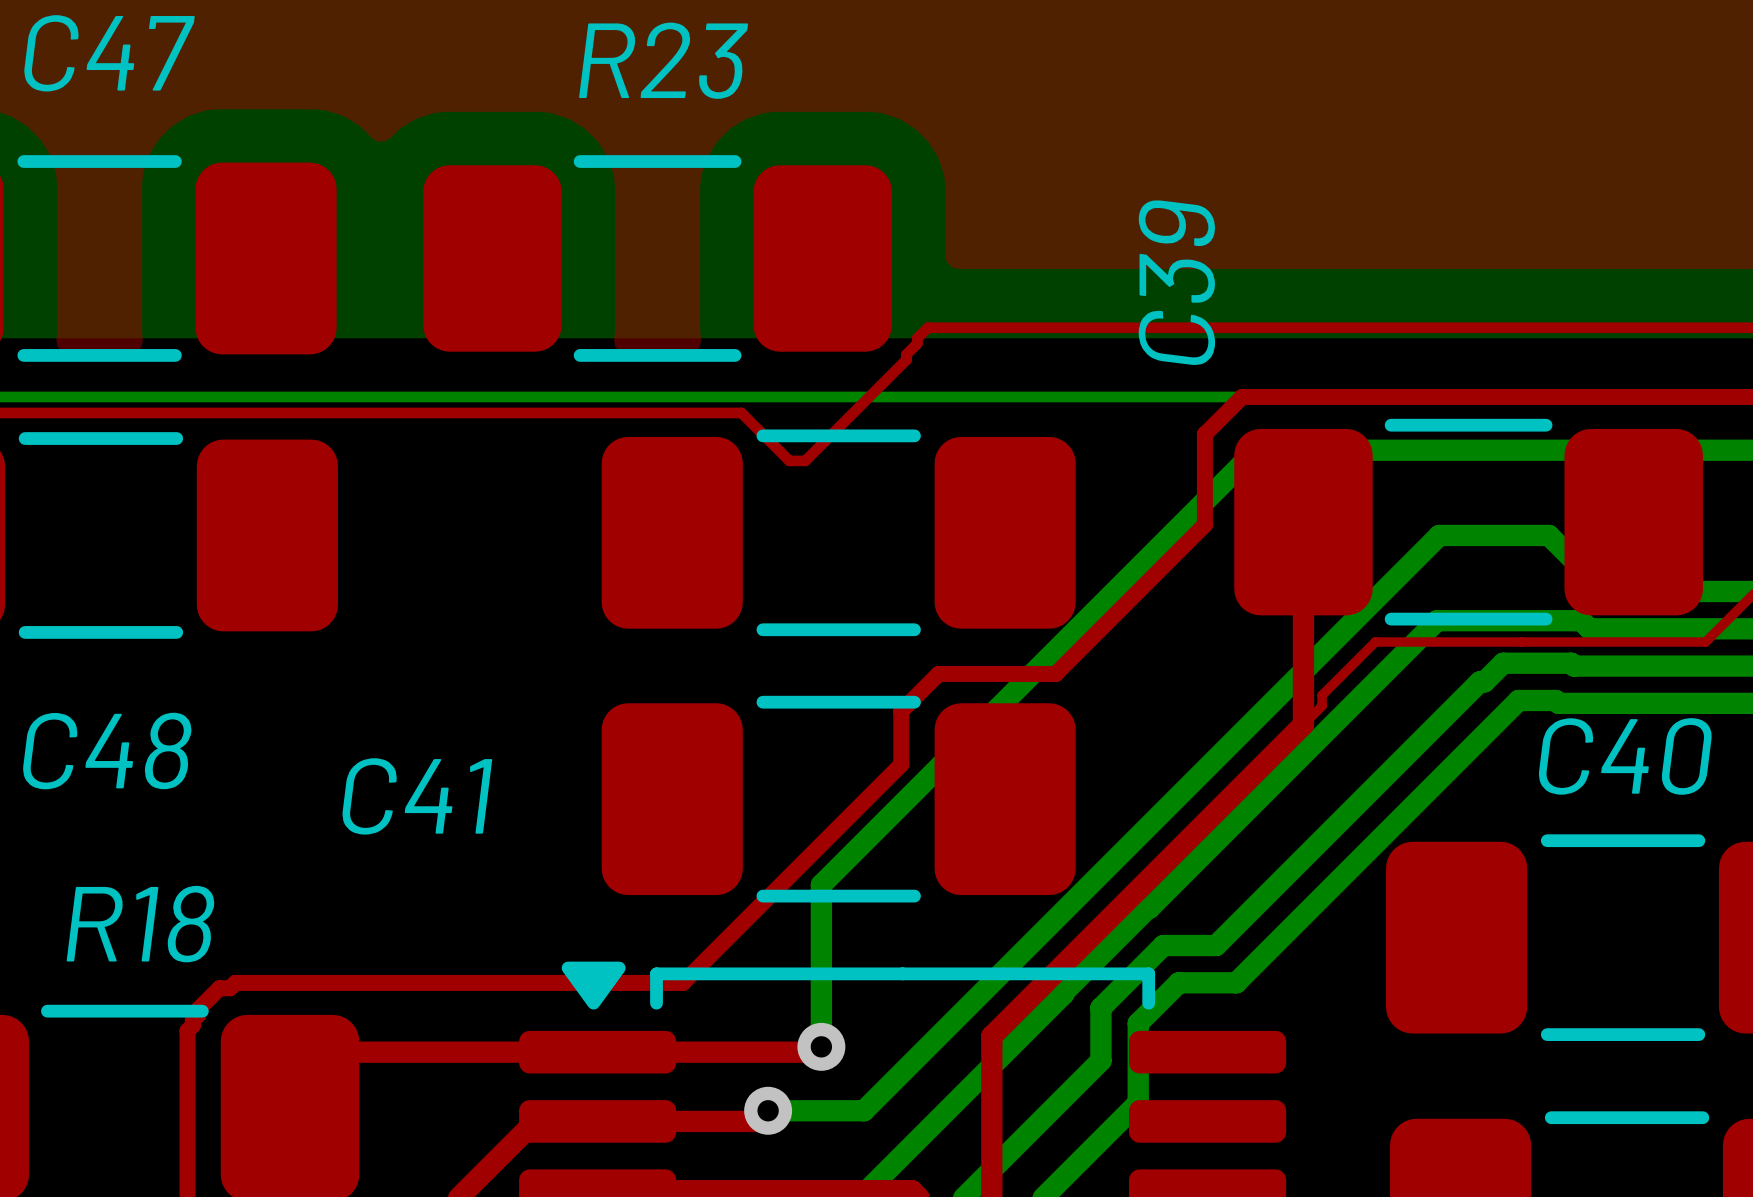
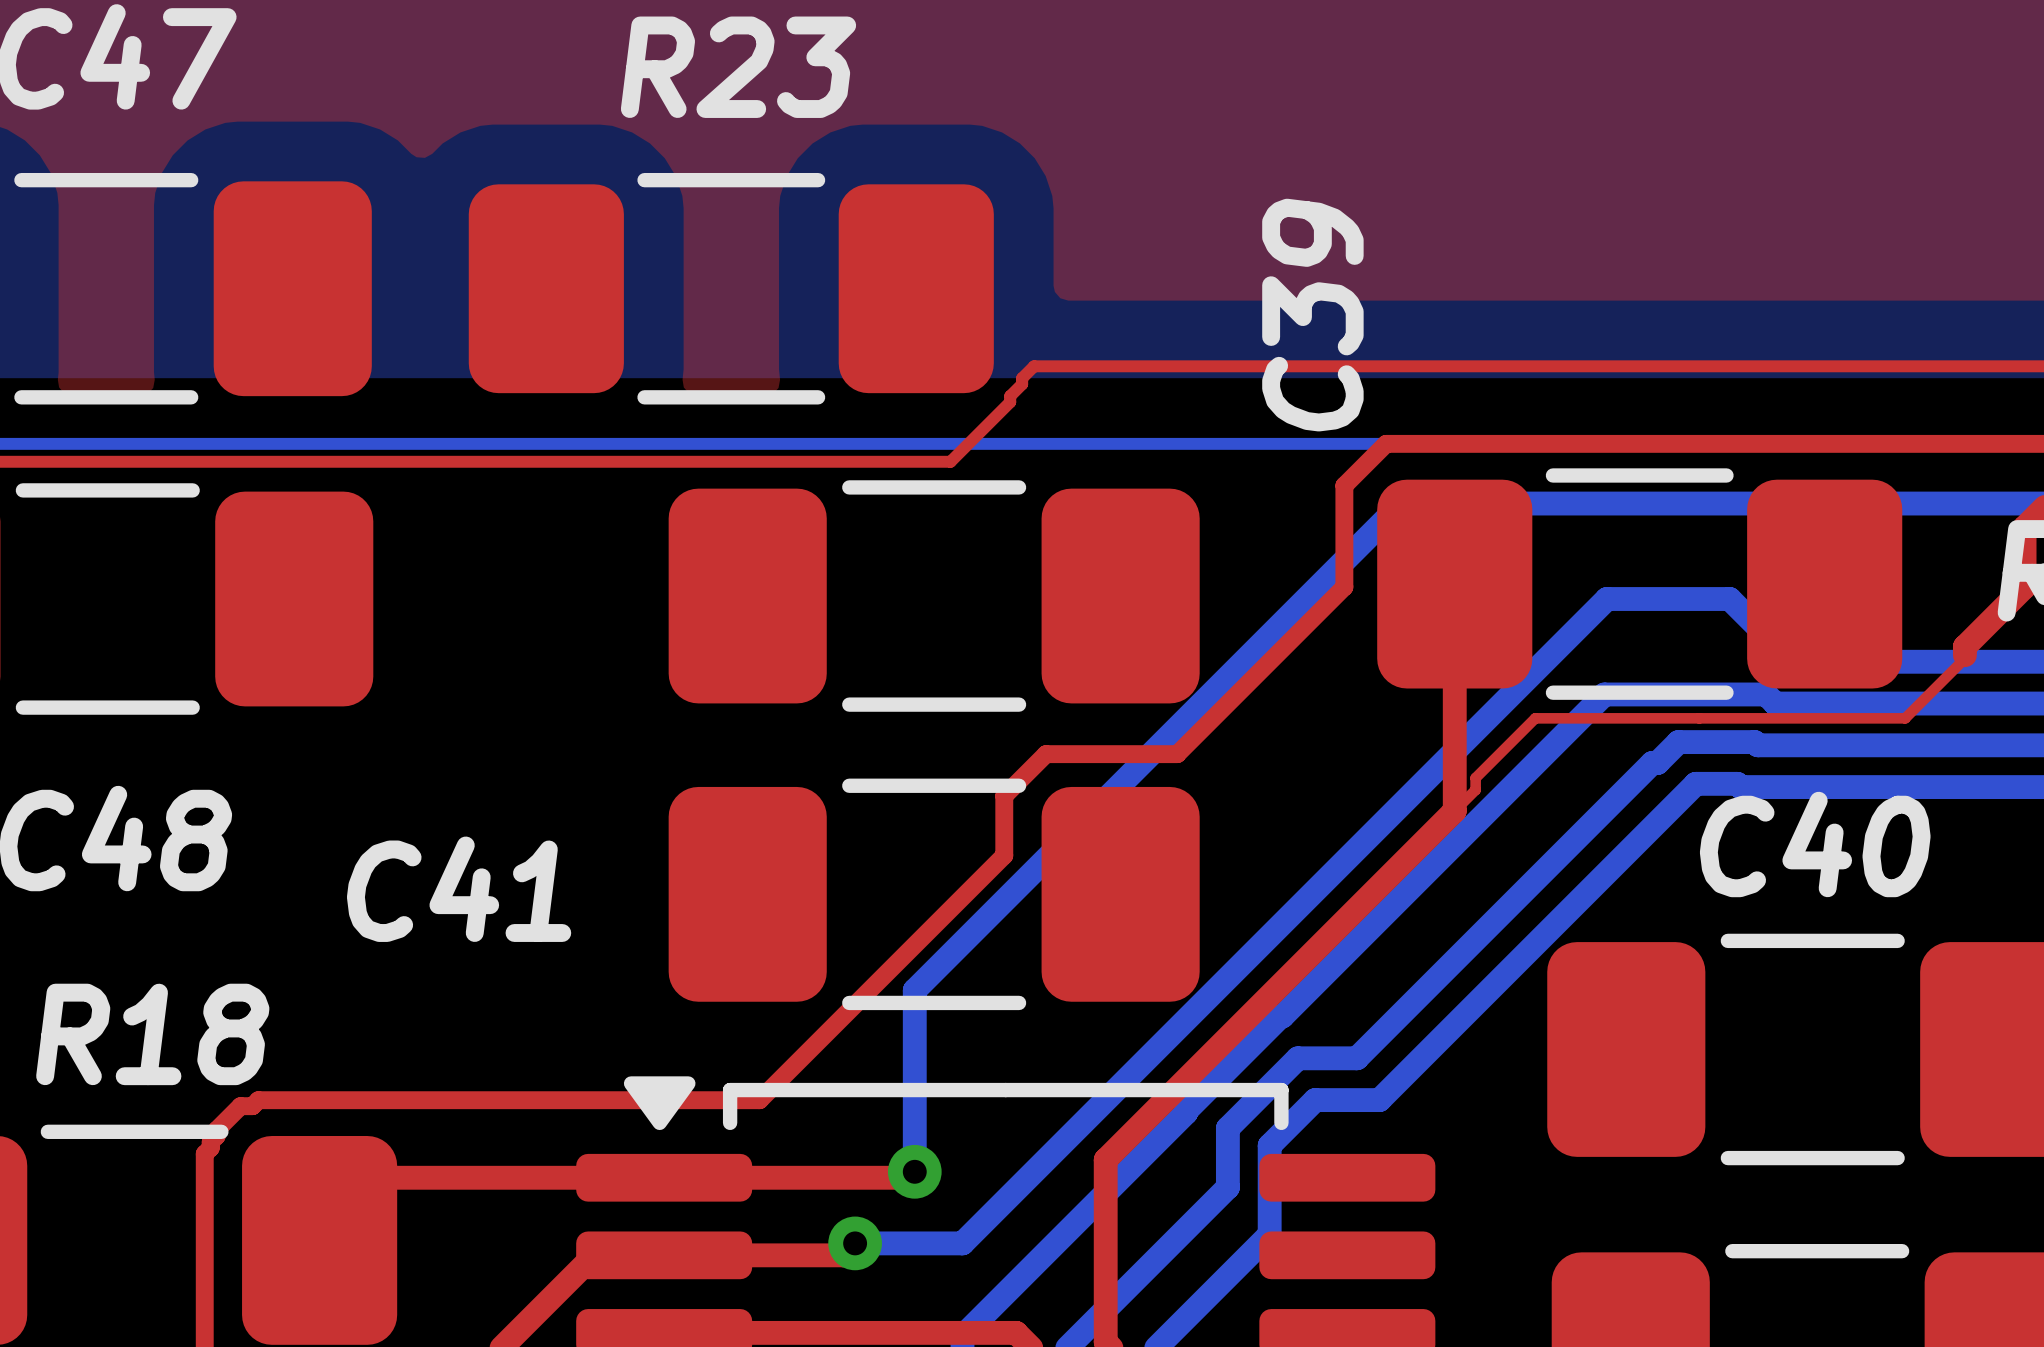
top track: (741, 412) (789, 460) (805, 460) (853, 412) -> (825, 461) (950, 461)

